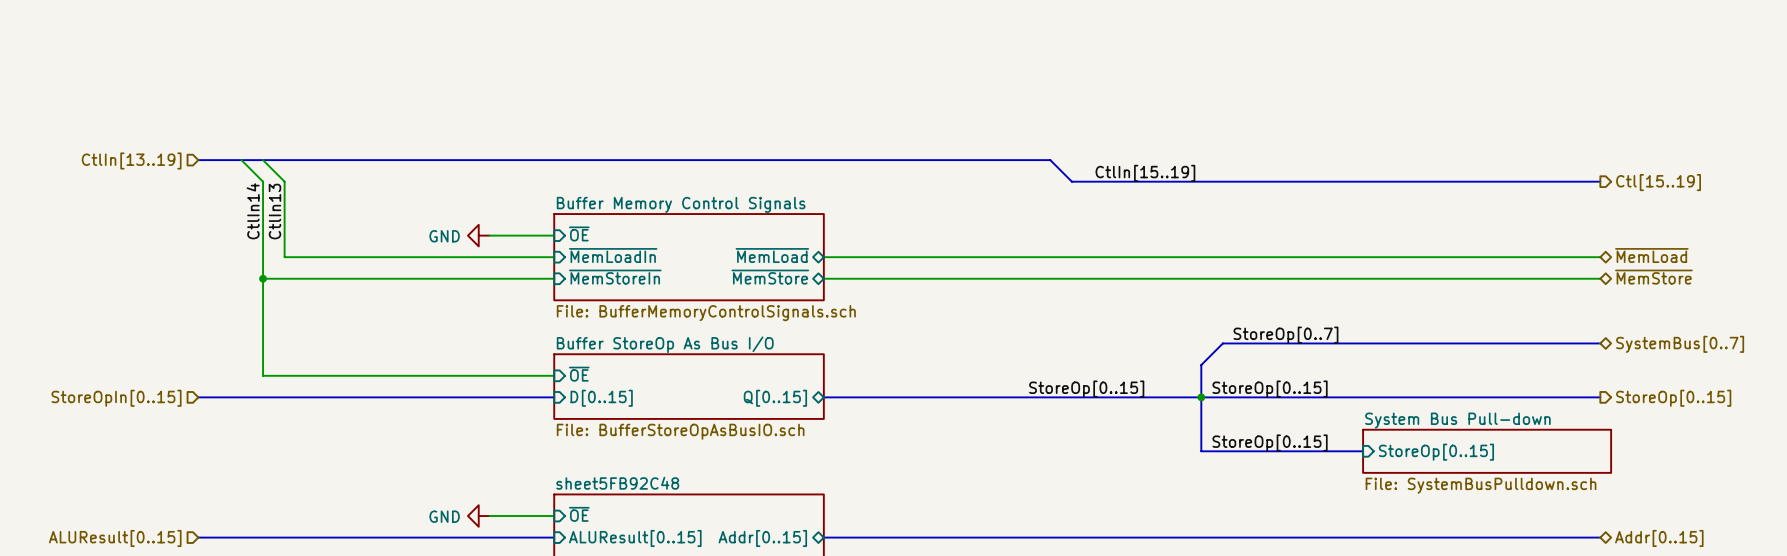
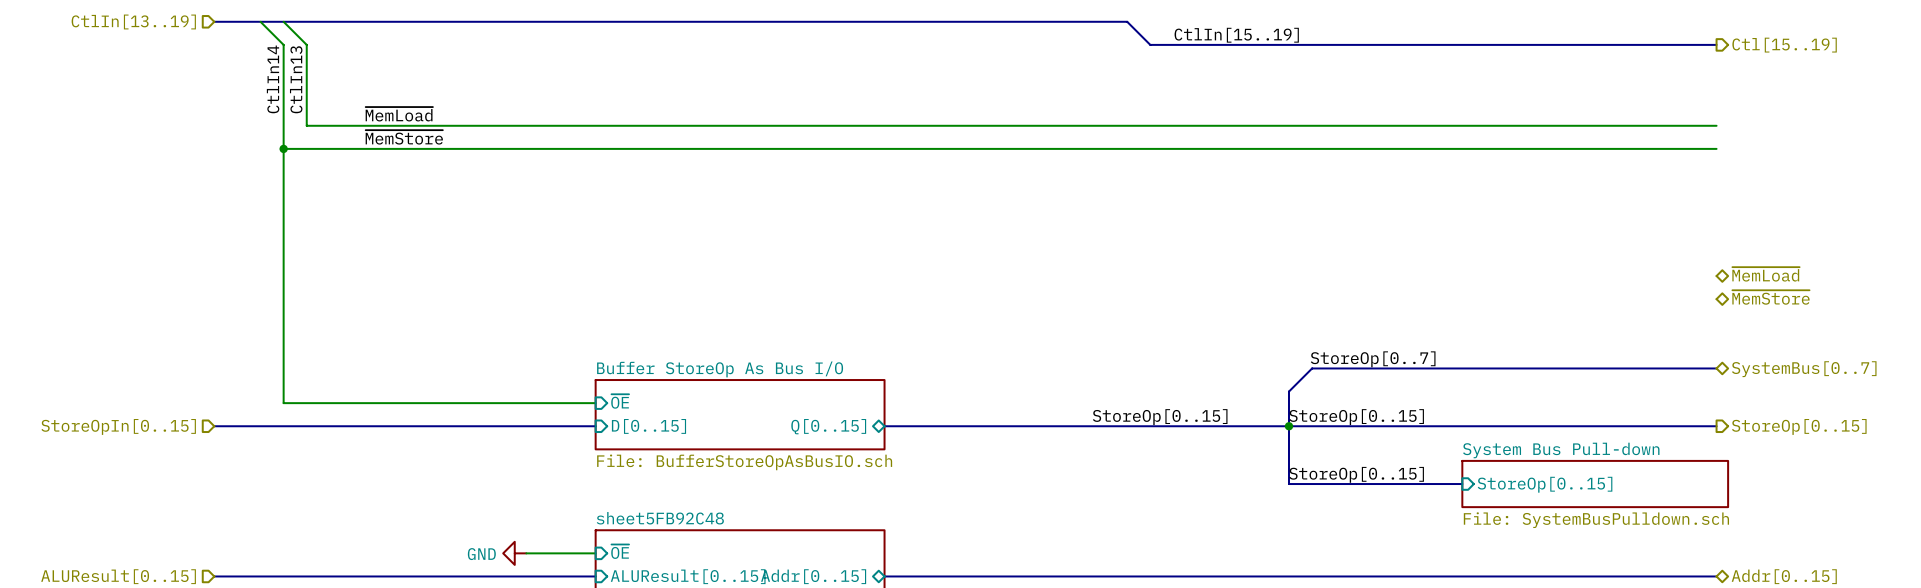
wire: none -> (283, 21) (306, 44) (306, 125) (1716, 125)
label: none -> ~{MemLoad} (399, 114)
label: none -> ~{MemStore} (404, 137)
wire: none -> (283, 148) (1716, 148)
junction: none -> (283, 148)
hierarchical label position: CtlIn[13..19] (131, 160) -> CtlIn[13..19] (133, 21)
bus: (198, 160) (1050, 160) (1071, 181) (1600, 181) -> (214, 21) (1127, 21) (1150, 44) (1716, 44)
wire: (241, 160) (263, 181) -> (260, 21) (283, 44) (283, 195)
wire: (263, 160) (284, 181) (284, 257) (554, 257) -> none
label position: CtlIn[15..19] (1145, 173) -> CtlIn[15..19] (1236, 35)
hierarchical label position: Ctl[15..19] (1658, 182) -> Ctl[15..19] (1784, 45)
label position: CtlIn14 (253, 211) -> CtlIn14 (273, 79)
label position: CtlIn13 (274, 211) -> CtlIn13 (296, 79)
sheet pin: ~{OE} (579, 233) -> none
power symbol: GND (478, 235) -> none
wire: (489, 235) (554, 235) -> none
sheet pin: ~{MemLoadIn} (613, 255) -> none
sheet pin: ~{MemLoad} (772, 255) -> none
sheet Buffer Memory Control Signals: File: BufferMemoryControlSignals.sch (689, 257) -> none
wire: (823, 257) (1600, 257) -> none
sheet pin: ~{MemStoreIn} (615, 277) -> none
sheet pin: ~{MemStore} (770, 277) -> none
wire: (263, 278) (554, 278) -> none
junction: (263, 278) -> none
wire: (823, 278) (1600, 278) -> none

